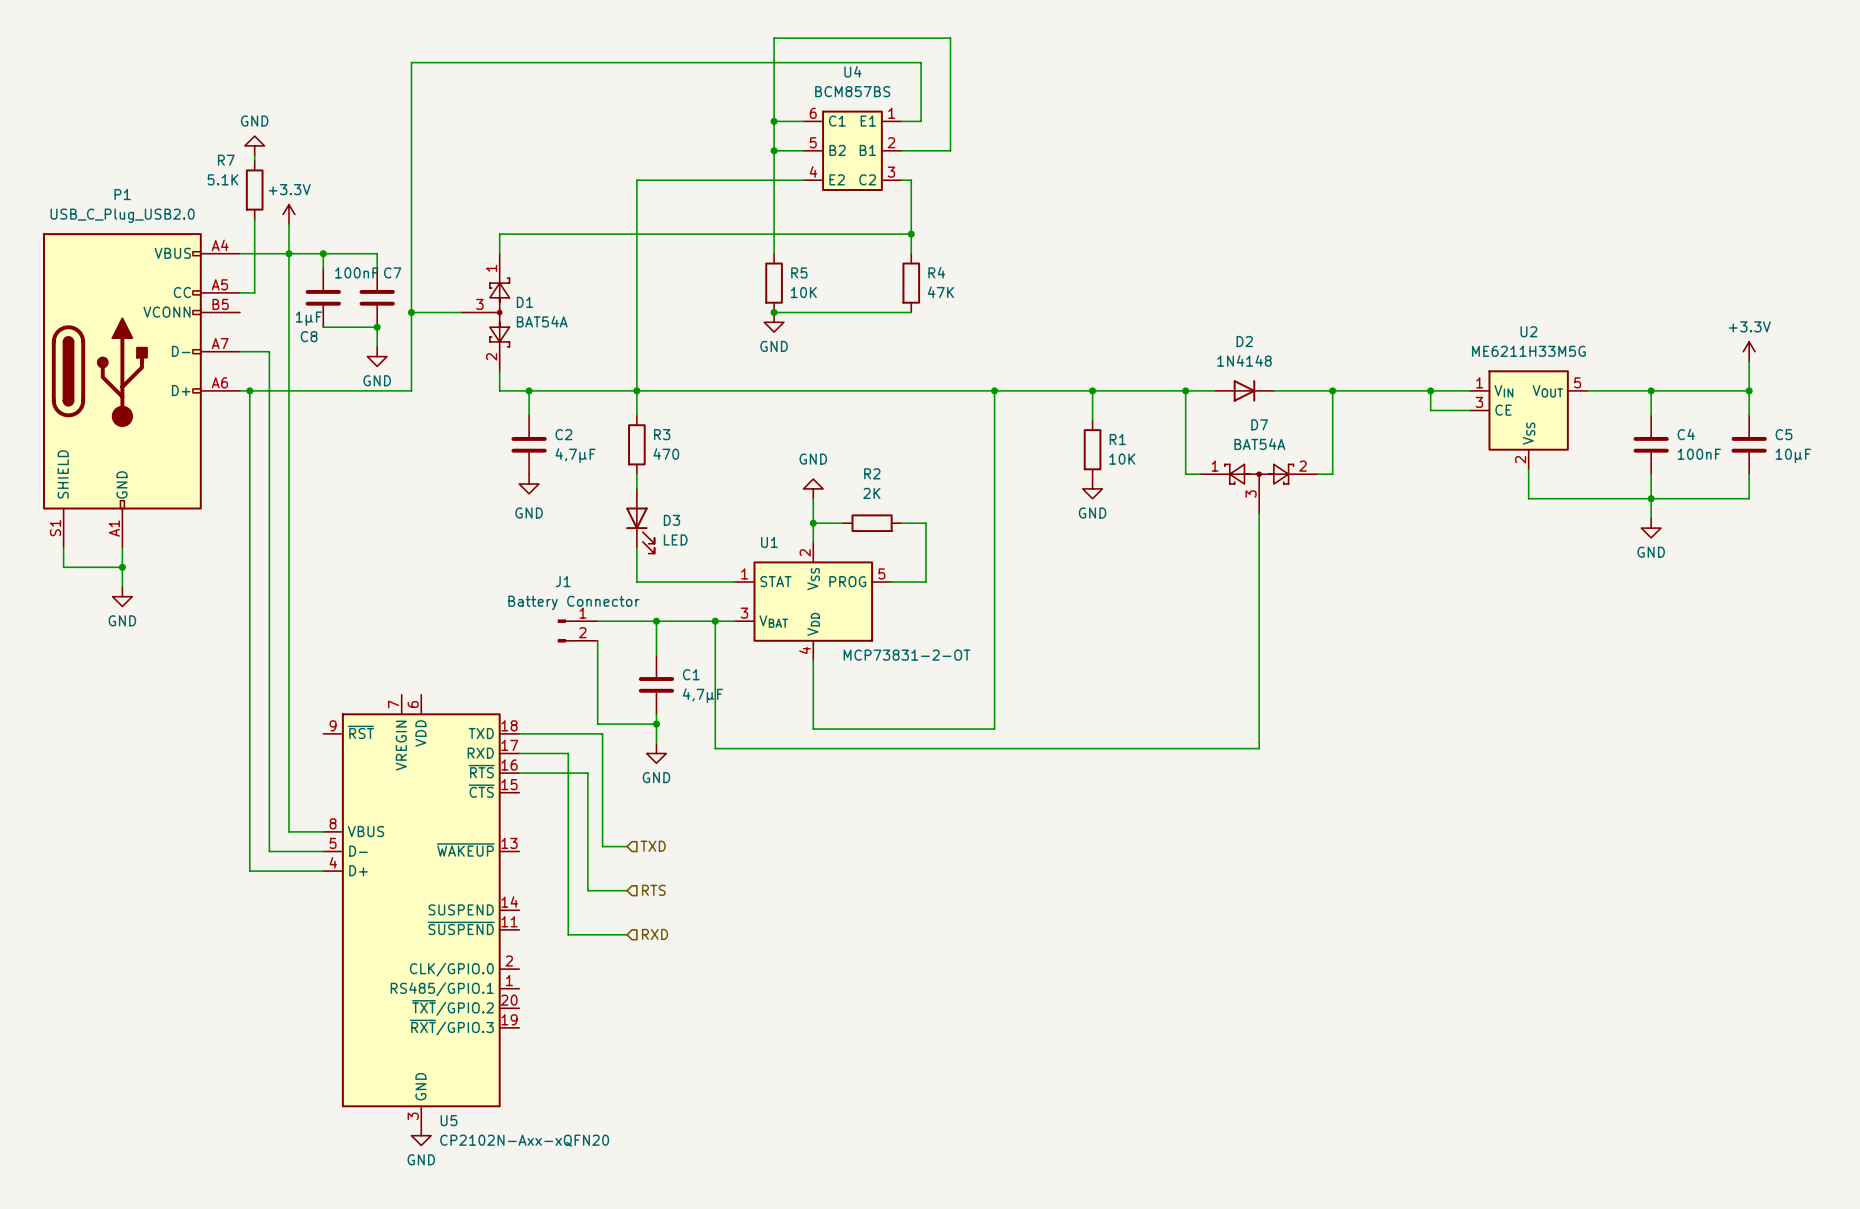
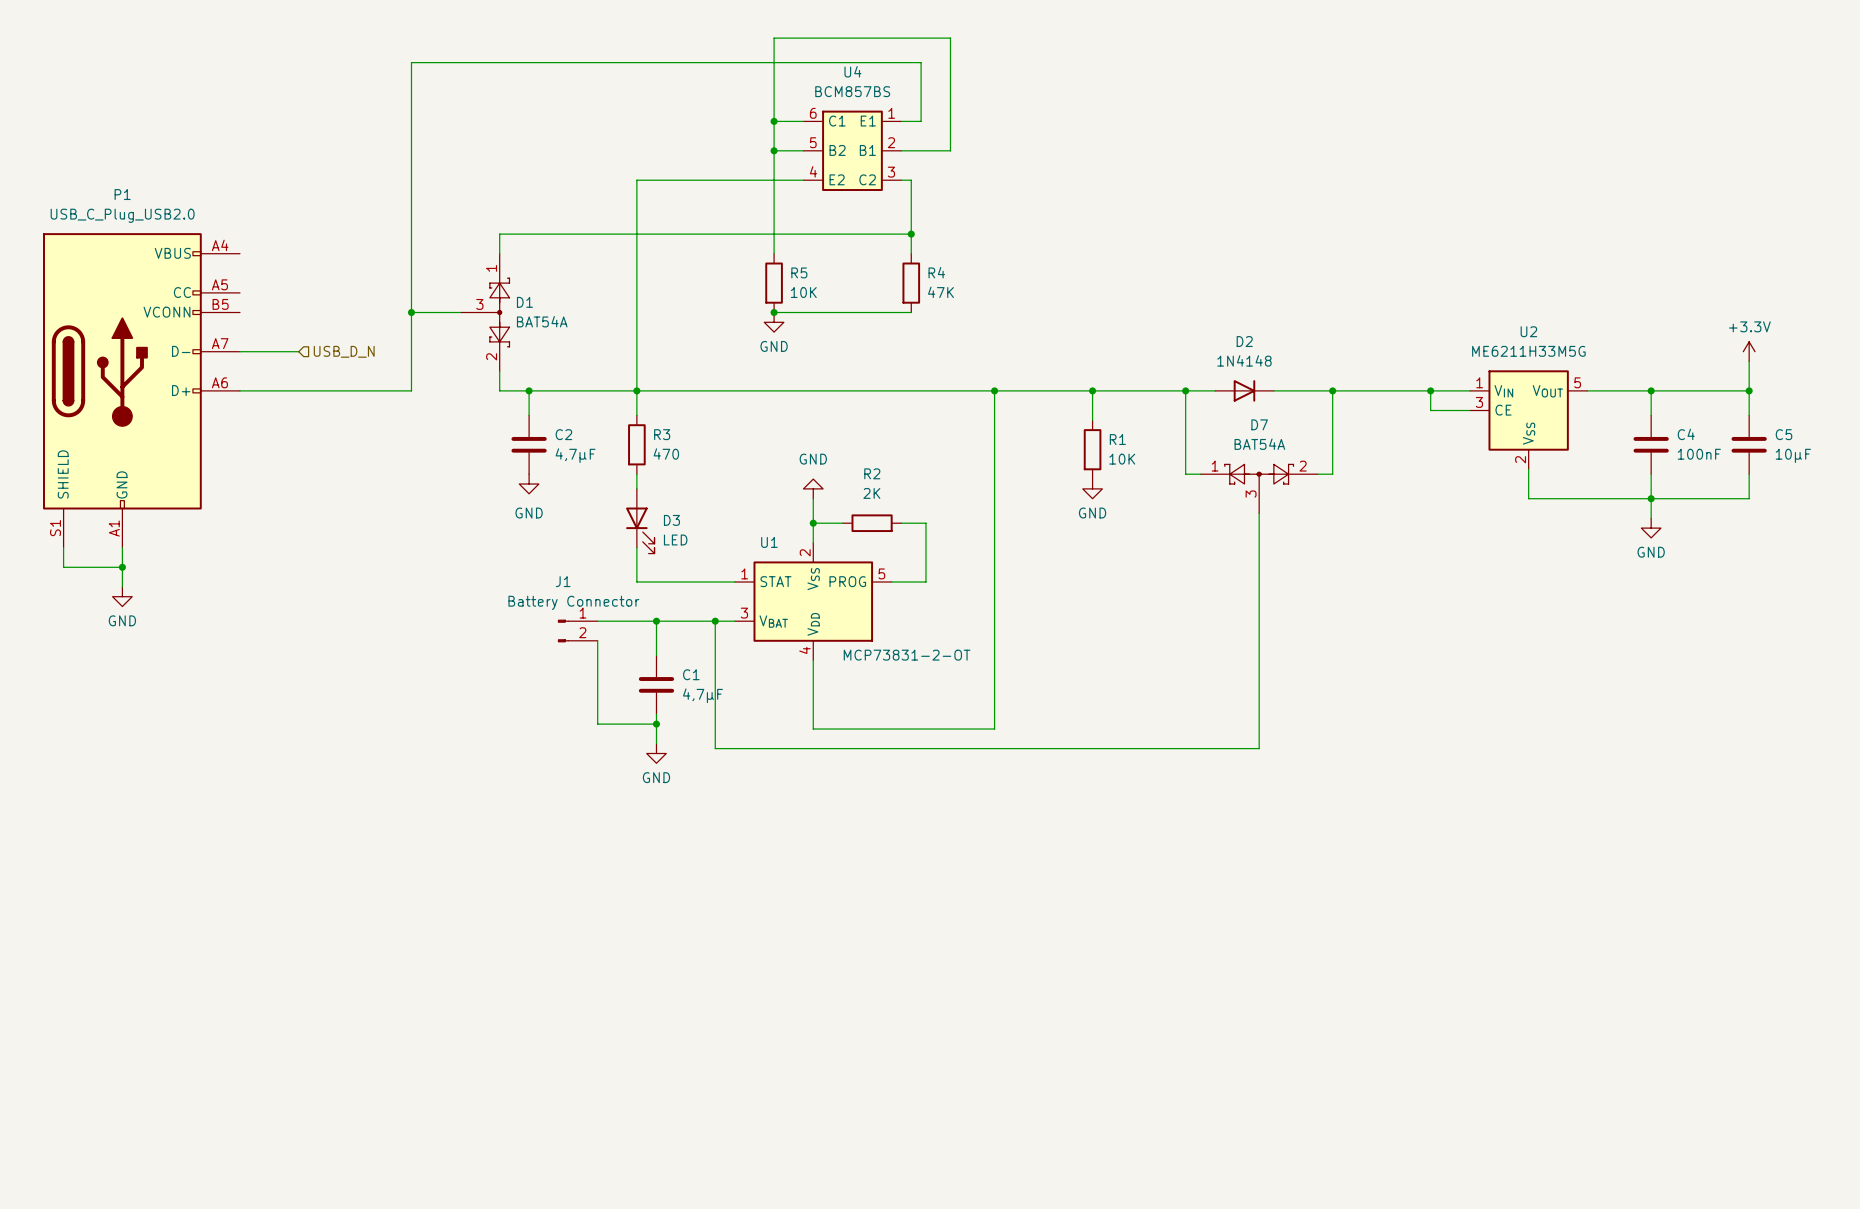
power symbol: GND (254, 145) -> none
wire: (254, 155) (254, 160) -> none
R7: 5.1K (254, 190) -> none
power symbol: +3.3V (288, 214) -> none
wire: (254, 219) (254, 292) (239, 292) -> none
wire: (288, 224) (288, 831) (323, 831) -> none
wire: (239, 253) (377, 253) (377, 268) -> none
junction: (288, 253) -> none
wire: (323, 253) (323, 268) -> none
junction: (323, 253) -> none
C8: 1µF (323, 297) -> none
C7: 100nF (377, 297) -> none
wire: (323, 327) (377, 327) (377, 346) -> none
junction: (377, 327) -> none
wire: (269, 351) (269, 851) (323, 851) -> (269, 351) (298, 351)
hierarchical label: none -> USB_D_N (344, 351)
power symbol: GND (377, 356) -> none
wire: (249, 390) (249, 871) (323, 871) -> none
junction: (249, 390) -> none
wire: (519, 733) (602, 733) (602, 846) (627, 846) -> none
wire: (519, 753) (568, 753) (568, 934) (627, 934) -> none
wire: (519, 773) (587, 773) (587, 890) (627, 890) -> none
hierarchical label: TXD (653, 846) -> none
hierarchical label: RTS (653, 890) -> none
U5: CP2102N-Axx-xQFN20 (421, 910) -> none
hierarchical label: RXD (655, 934) -> none
power symbol: GND (421, 1135) -> none

